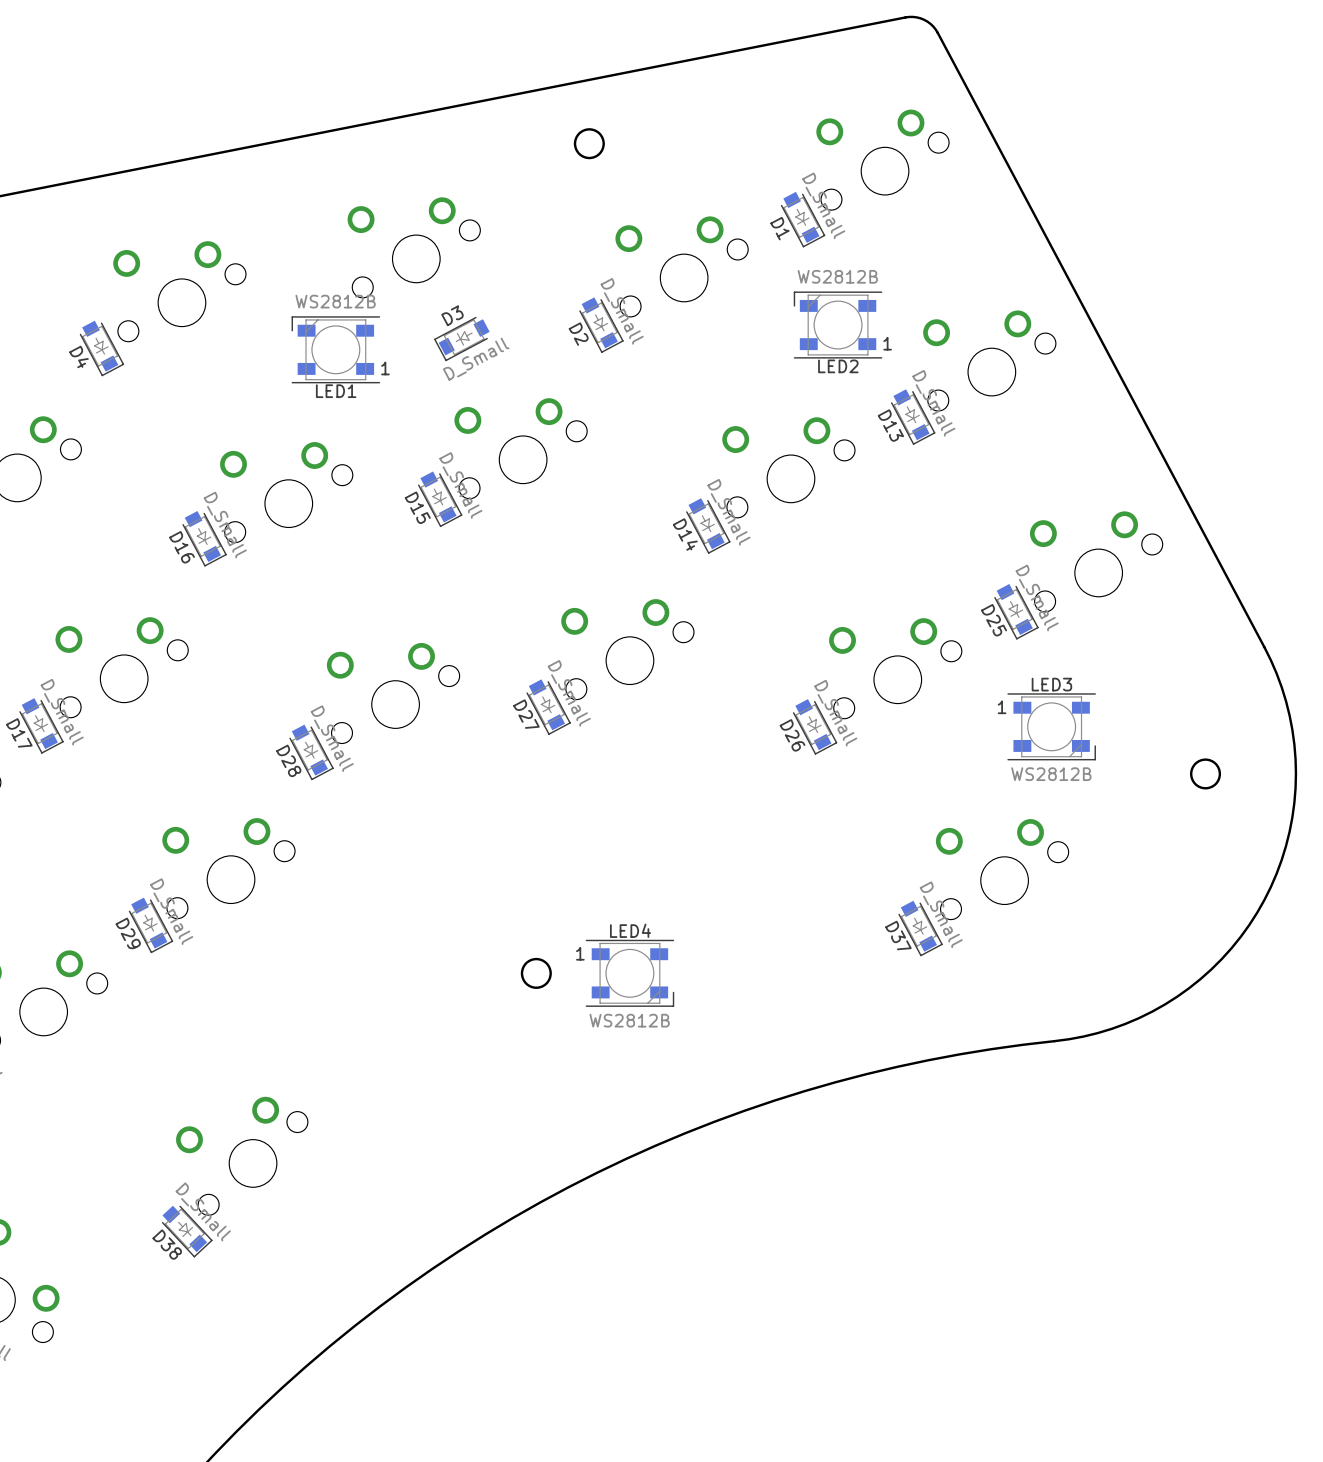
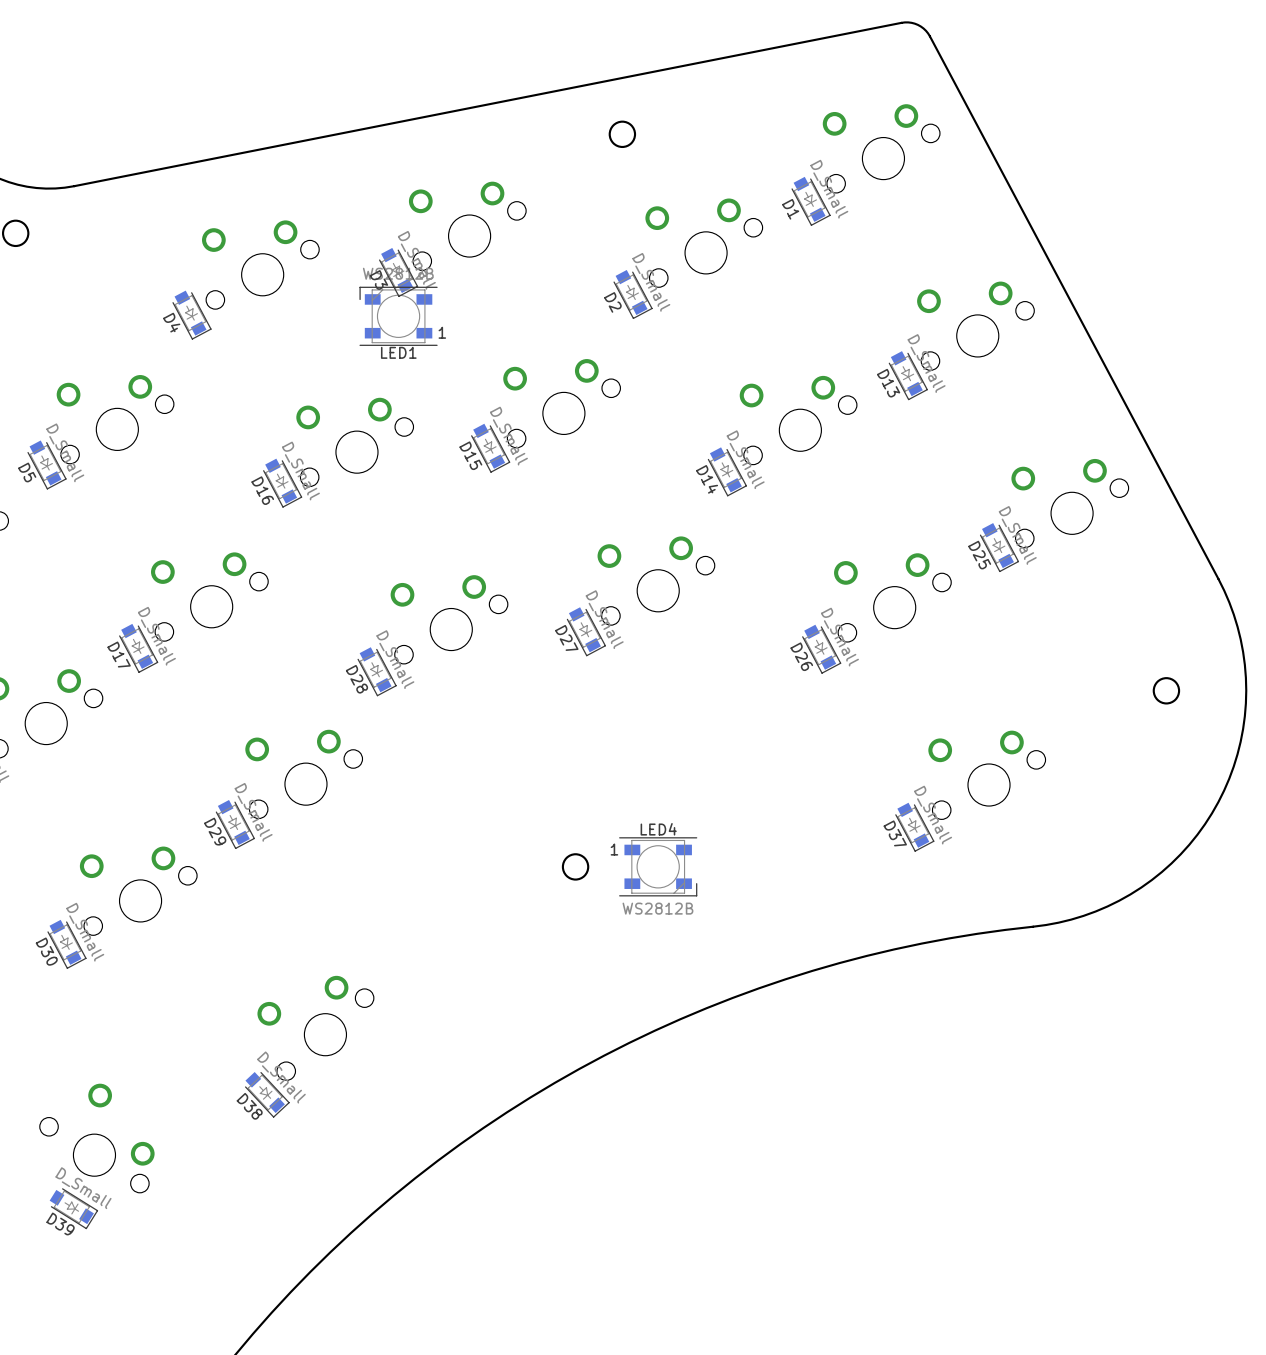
LED2: WS2812B (838, 325) -> none
D3 rotation: 0° (461, 338) -> 90° counterclockwise (398, 272)
D3 position: (461, 338) -> (398, 272)
LED3: WS2812B (1051, 726) -> none

